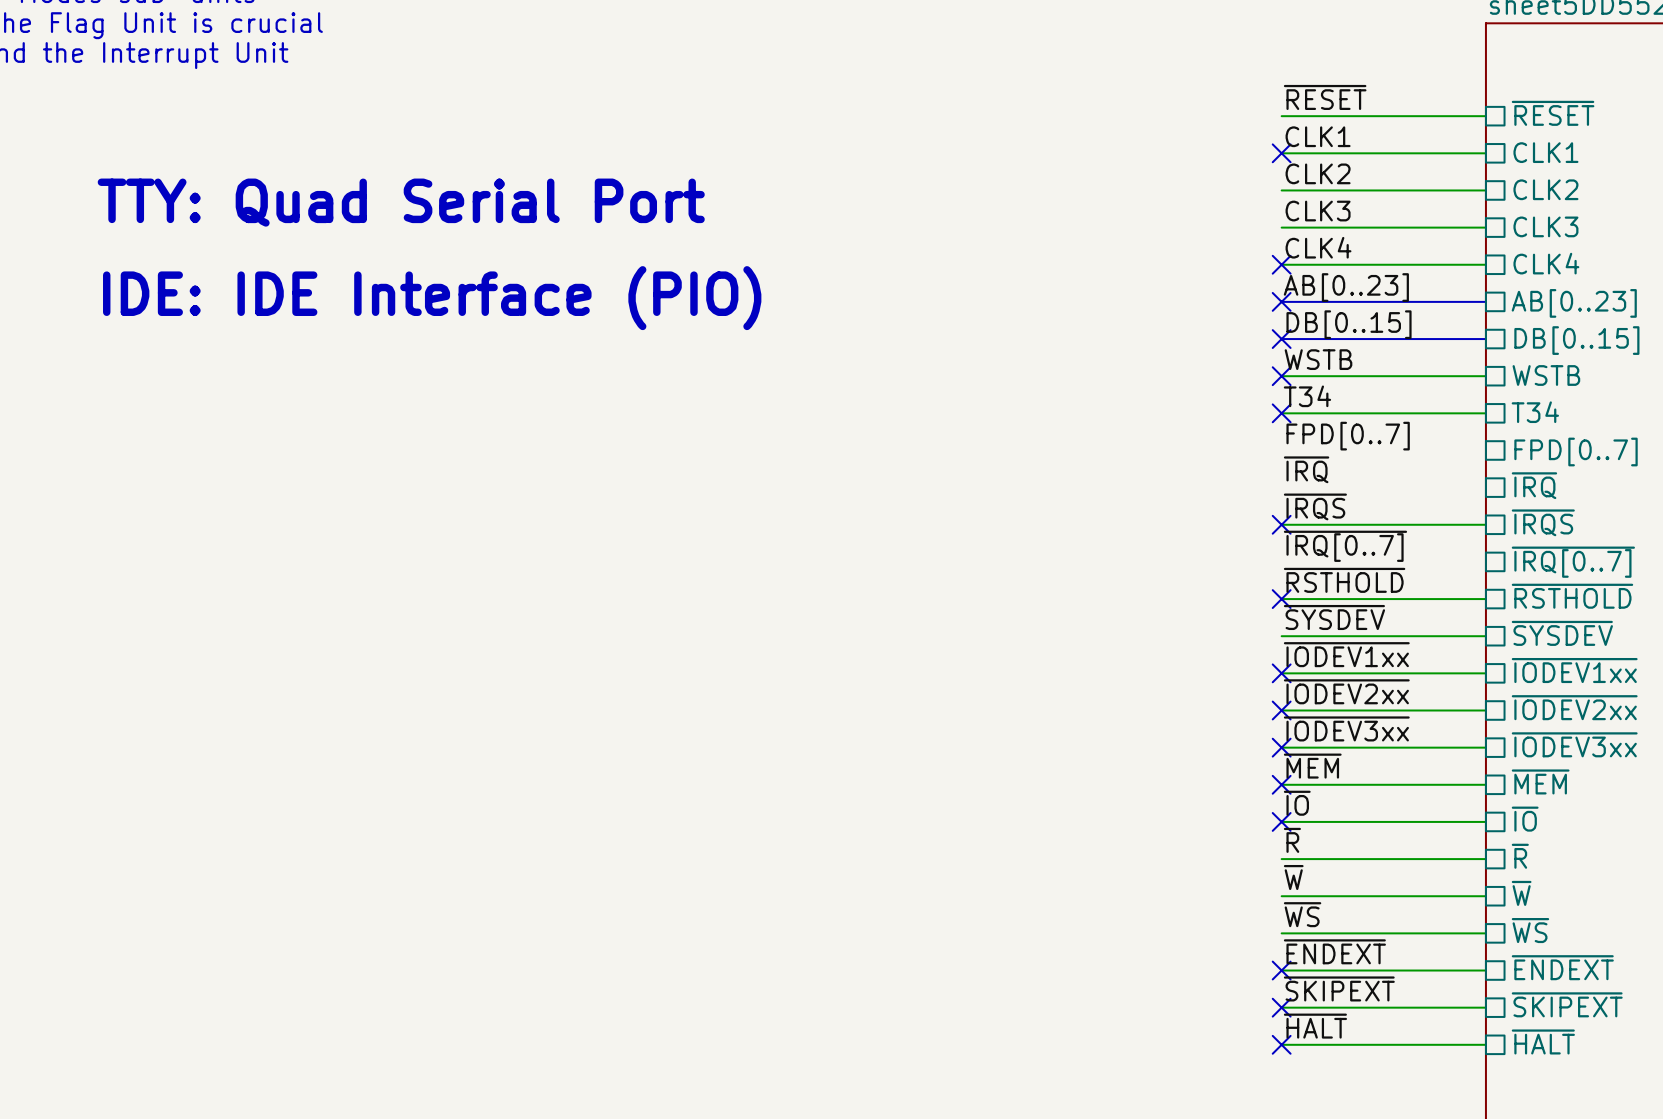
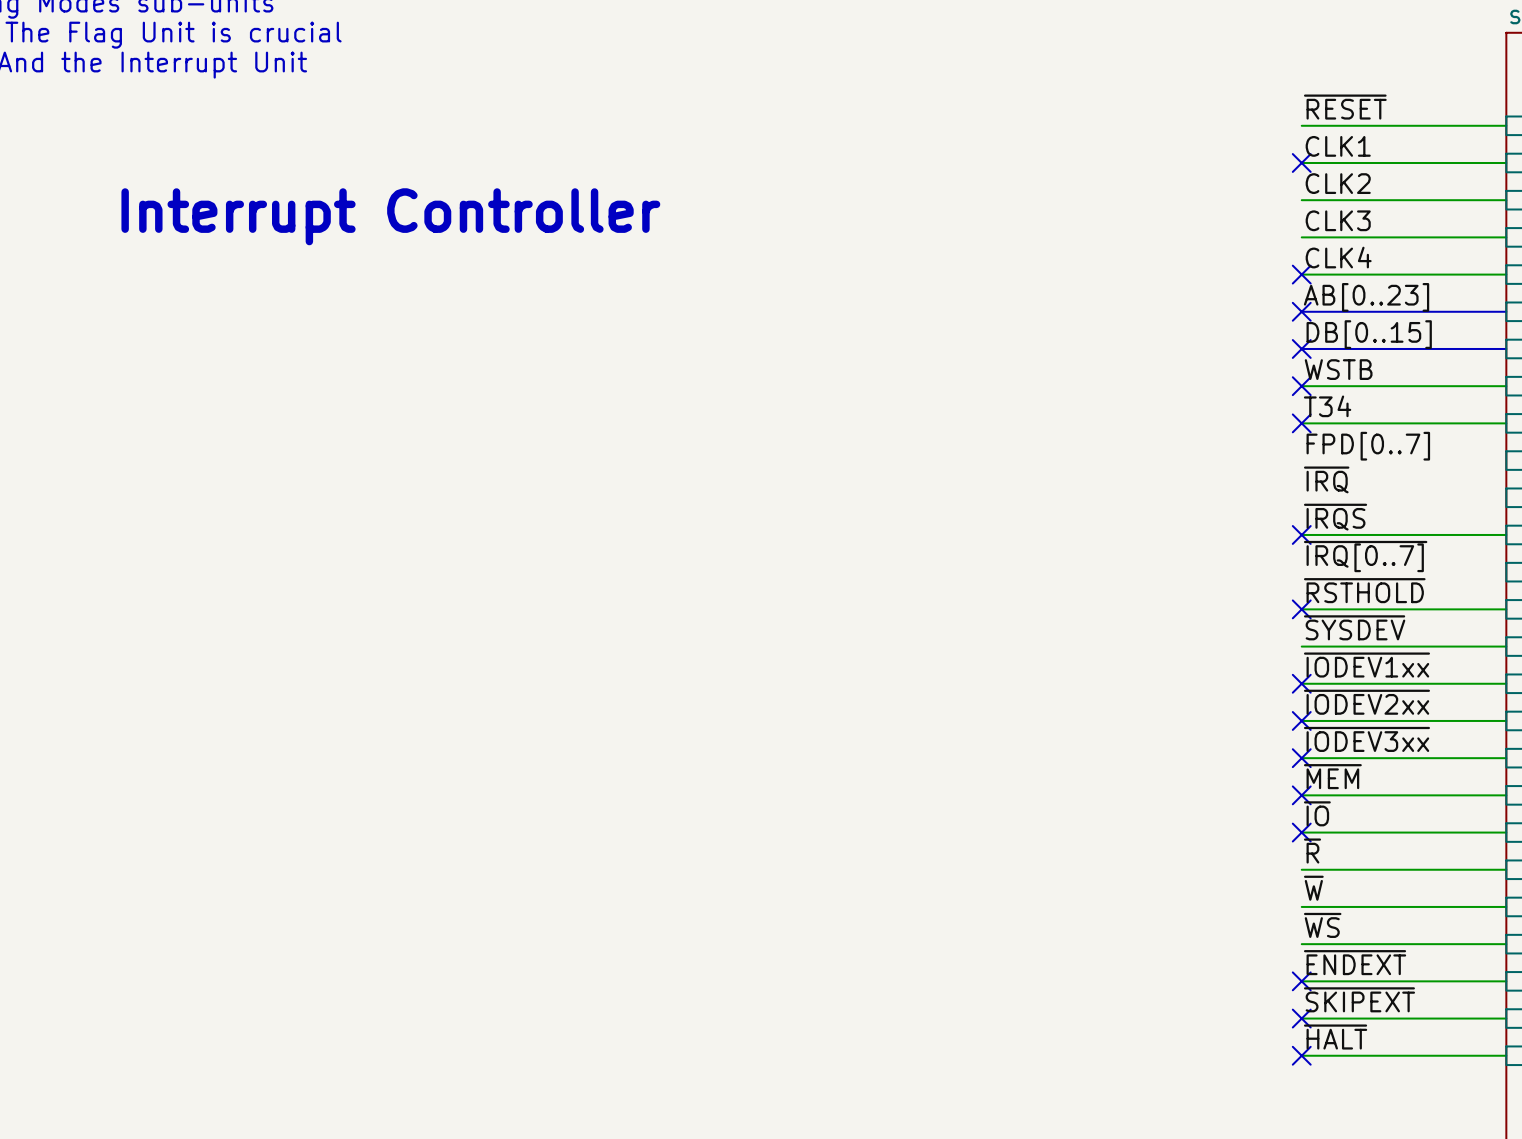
text: TTY: Quad Serial Port (401, 202) -> Interrupt Controller (390, 216)
text: IDE: IDE Interface (PIO) (432, 298) -> none

